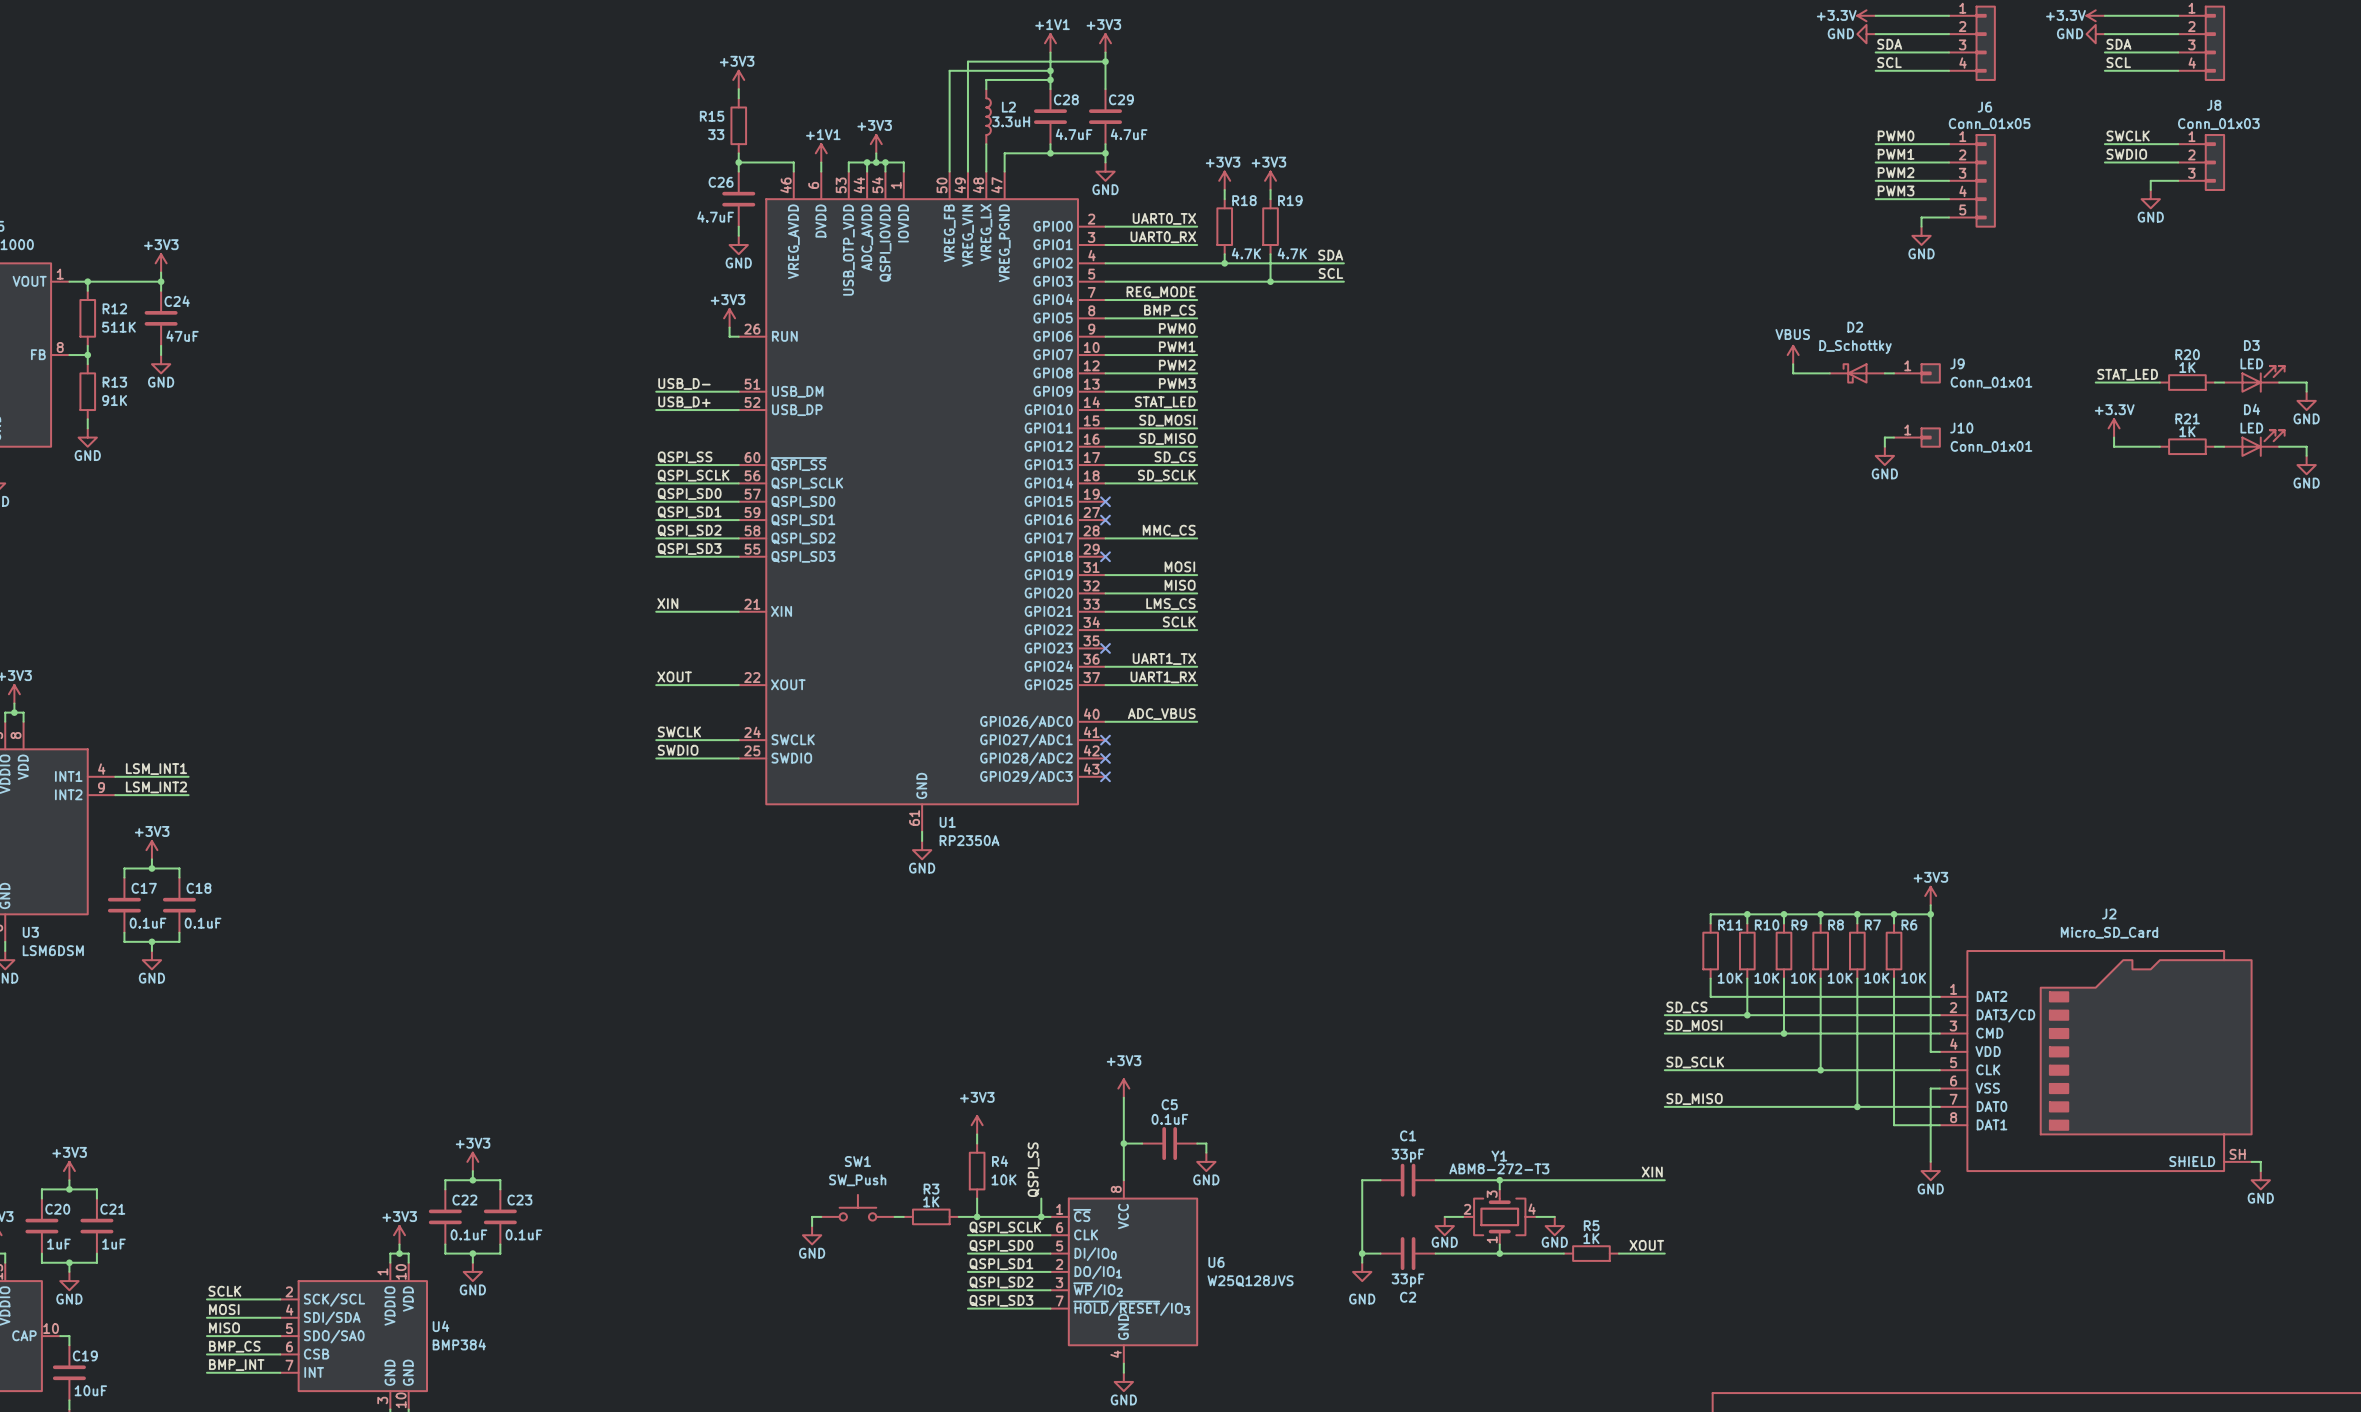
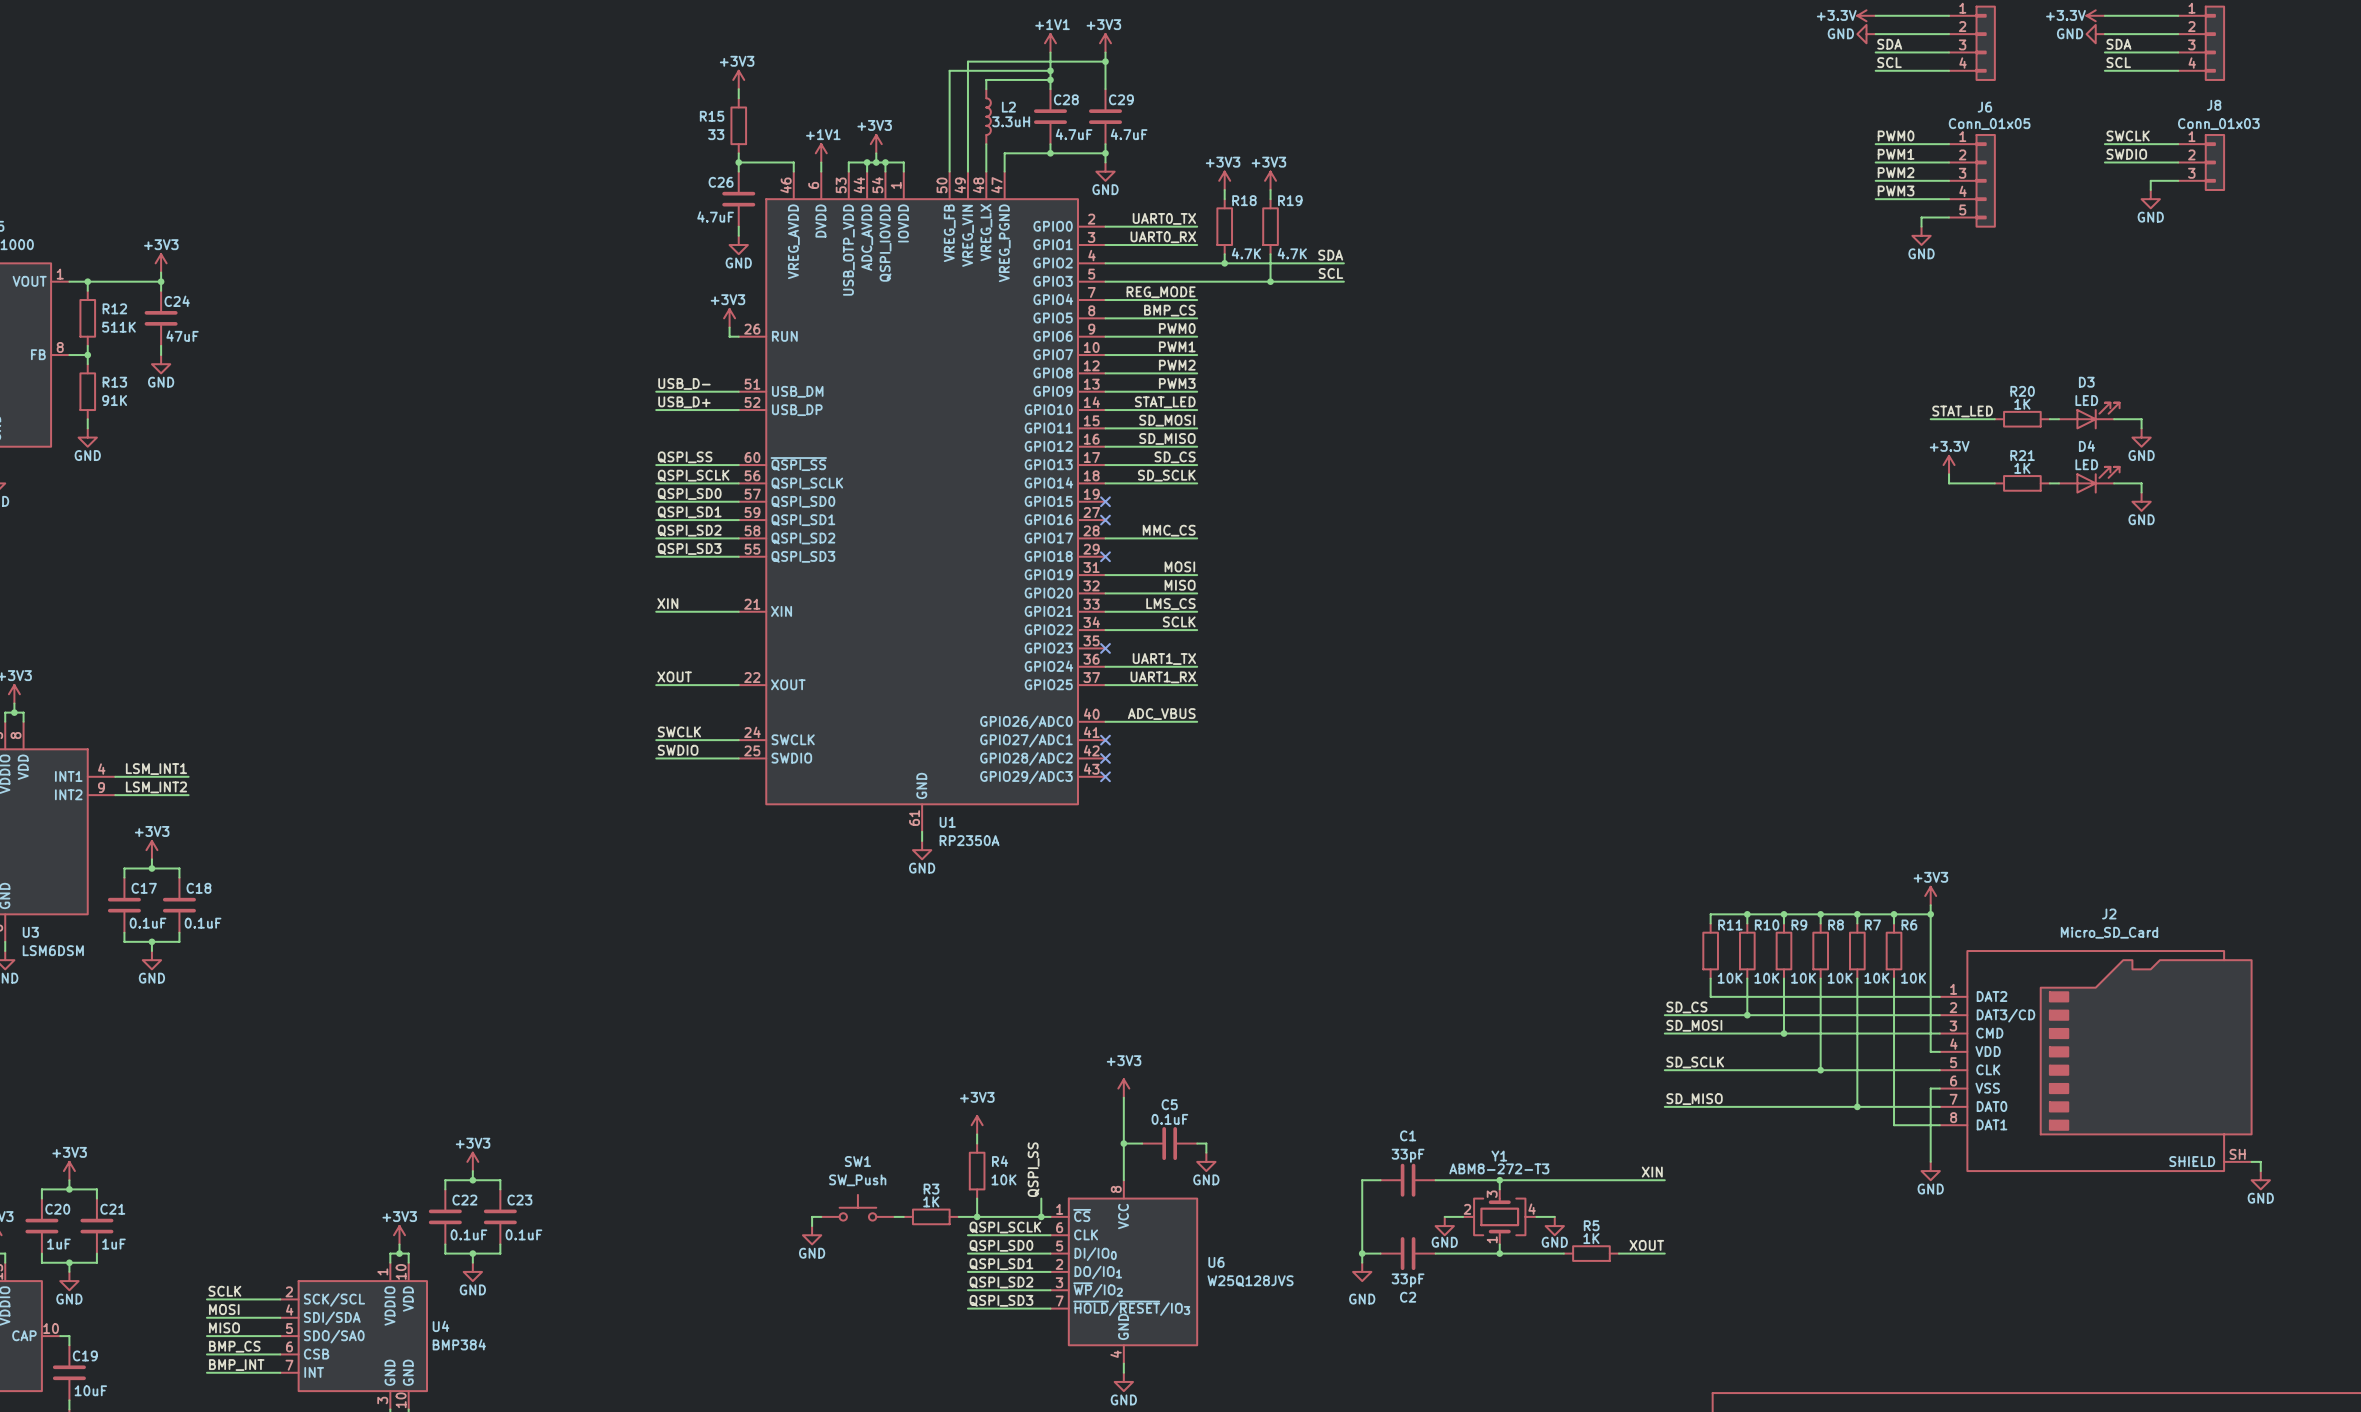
power symbol: VBUS (1793, 355) -> none
wire: (1793, 364) (1793, 373) (1829, 373) -> none
D2: D_Schottky (1857, 373) -> none
wire: (1884, 373) (1894, 373) -> none
J9: Conn_01x01 (1917, 373) -> none
label position: STAT_LED (2127, 374) -> STAT_LED (1962, 411)
D3 position: (2254, 379) -> (2089, 416)
wire: (2095, 382) (2159, 382) -> (1930, 419) (1994, 419)
R20 position: (2187, 382) -> (2022, 419)
wire: (2214, 382) (2224, 382) -> (2049, 419) (2059, 419)
wire: (2279, 382) (2306, 382) (2306, 391) -> (2114, 419) (2141, 419) (2141, 428)
power symbol: GND (2306, 400) -> none
power symbol position: +3.3V (2114, 428) -> +3.3V (1949, 465)
wire: (1894, 437) (1884, 437) (1884, 446) -> none
J10: Conn_01x01 (1917, 437) -> none
wire: (2114, 437) (2114, 446) (2159, 446) -> (1949, 474) (1949, 483) (1994, 483)
power symbol: none -> GND (2141, 437)
D4 position: (2254, 443) -> (2089, 480)
R21 position: (2187, 446) -> (2022, 483)
wire: (2214, 446) (2224, 446) -> (2049, 483) (2059, 483)
wire: (2279, 446) (2306, 446) (2306, 455) -> (2114, 483) (2141, 483) (2141, 492)
power symbol: GND (1884, 455) -> none
power symbol: GND (2306, 465) -> none
power symbol: none -> GND (2141, 501)

